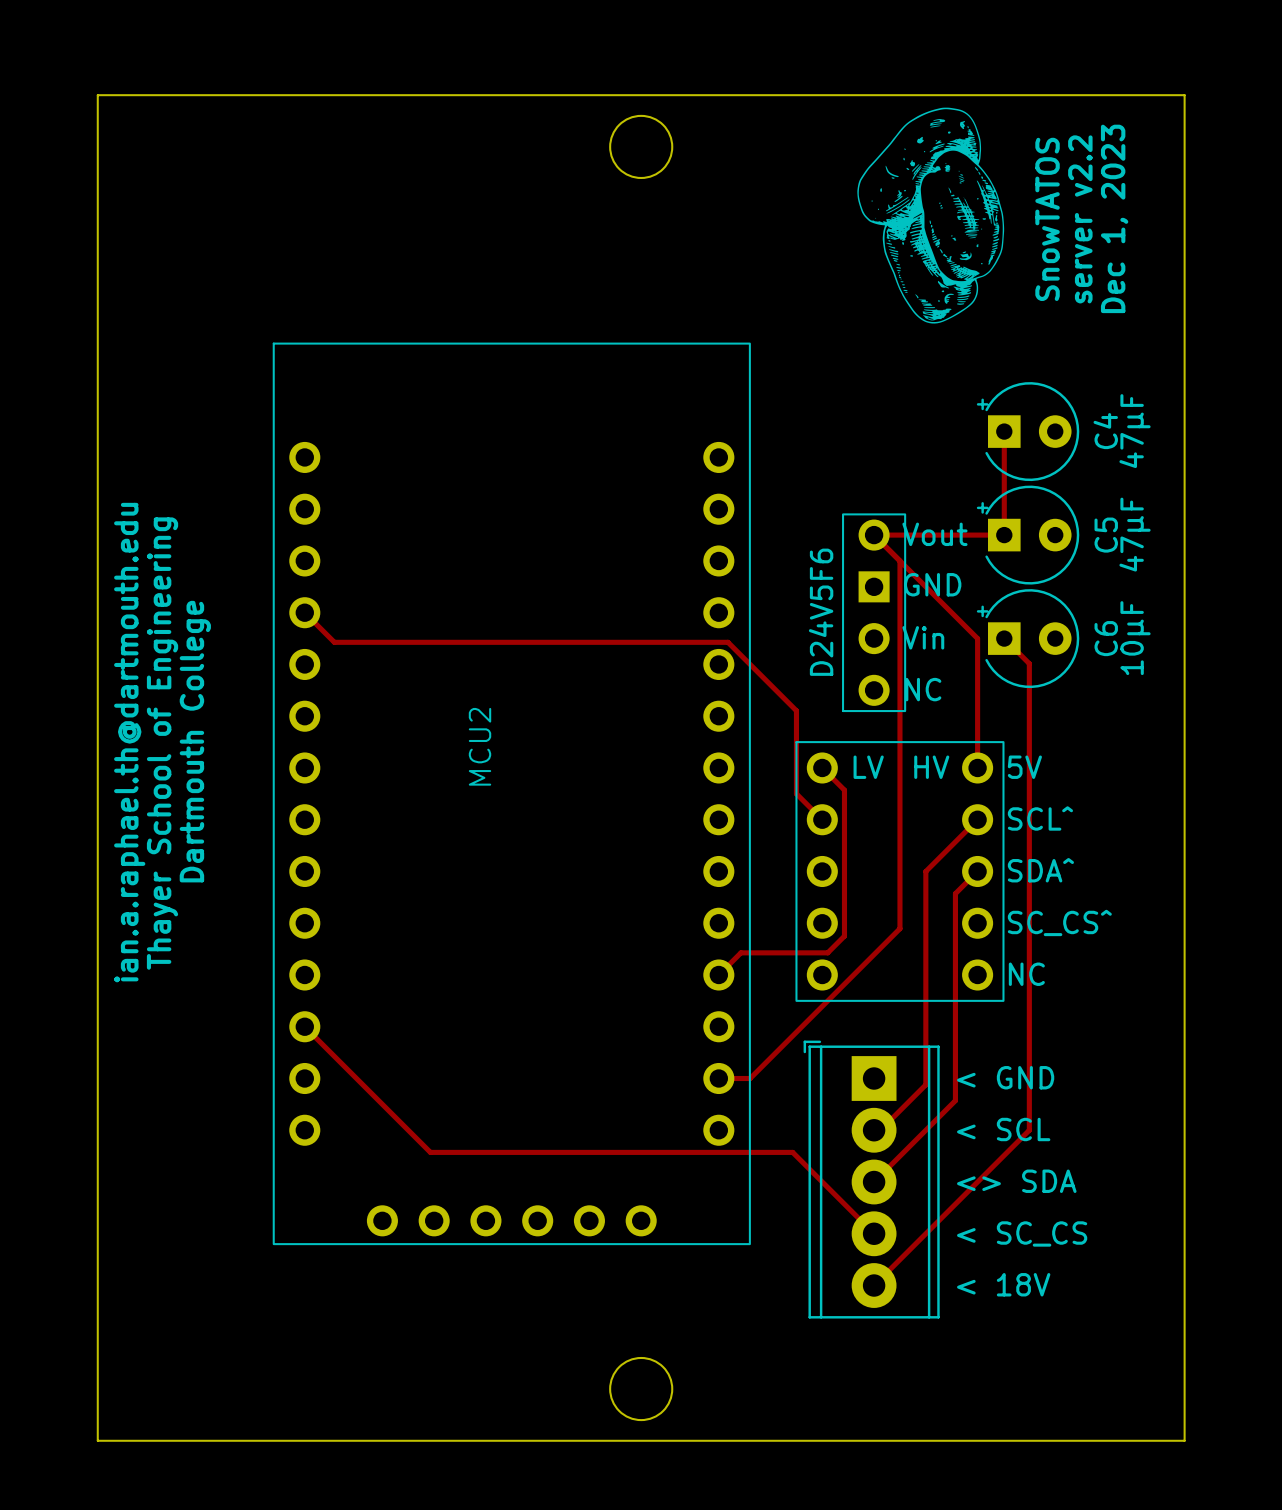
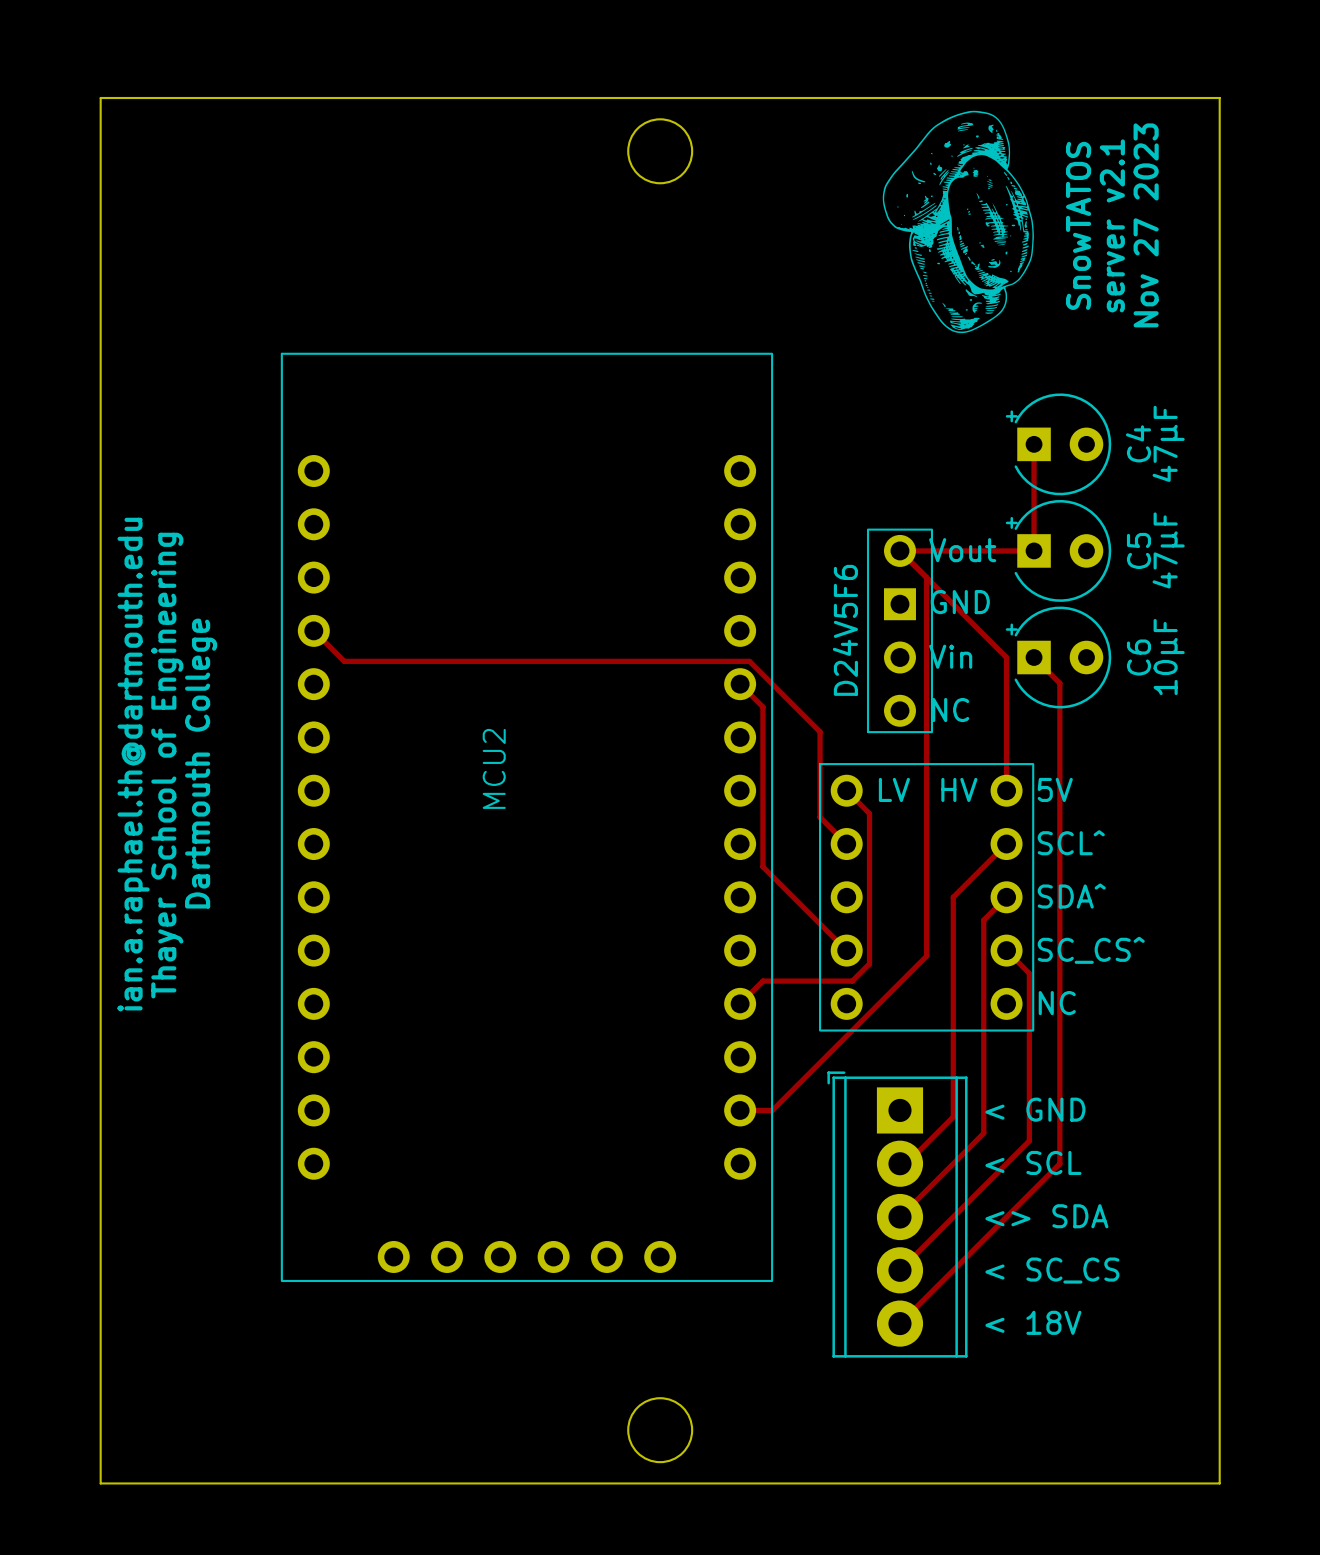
text: Dec 1, 2023 (1114, 218) -> Nov 27 2023 (1146, 225)
text: server v2.2 (1080, 219) -> server v2.1 (1112, 225)
track: none -> (740, 684) (762, 706) (762, 866) (846, 950)
track: (304, 1026) (430, 1152) (792, 1152) (874, 1233) -> (1006, 950) (1029, 973) (1029, 1140) (899, 1270)

